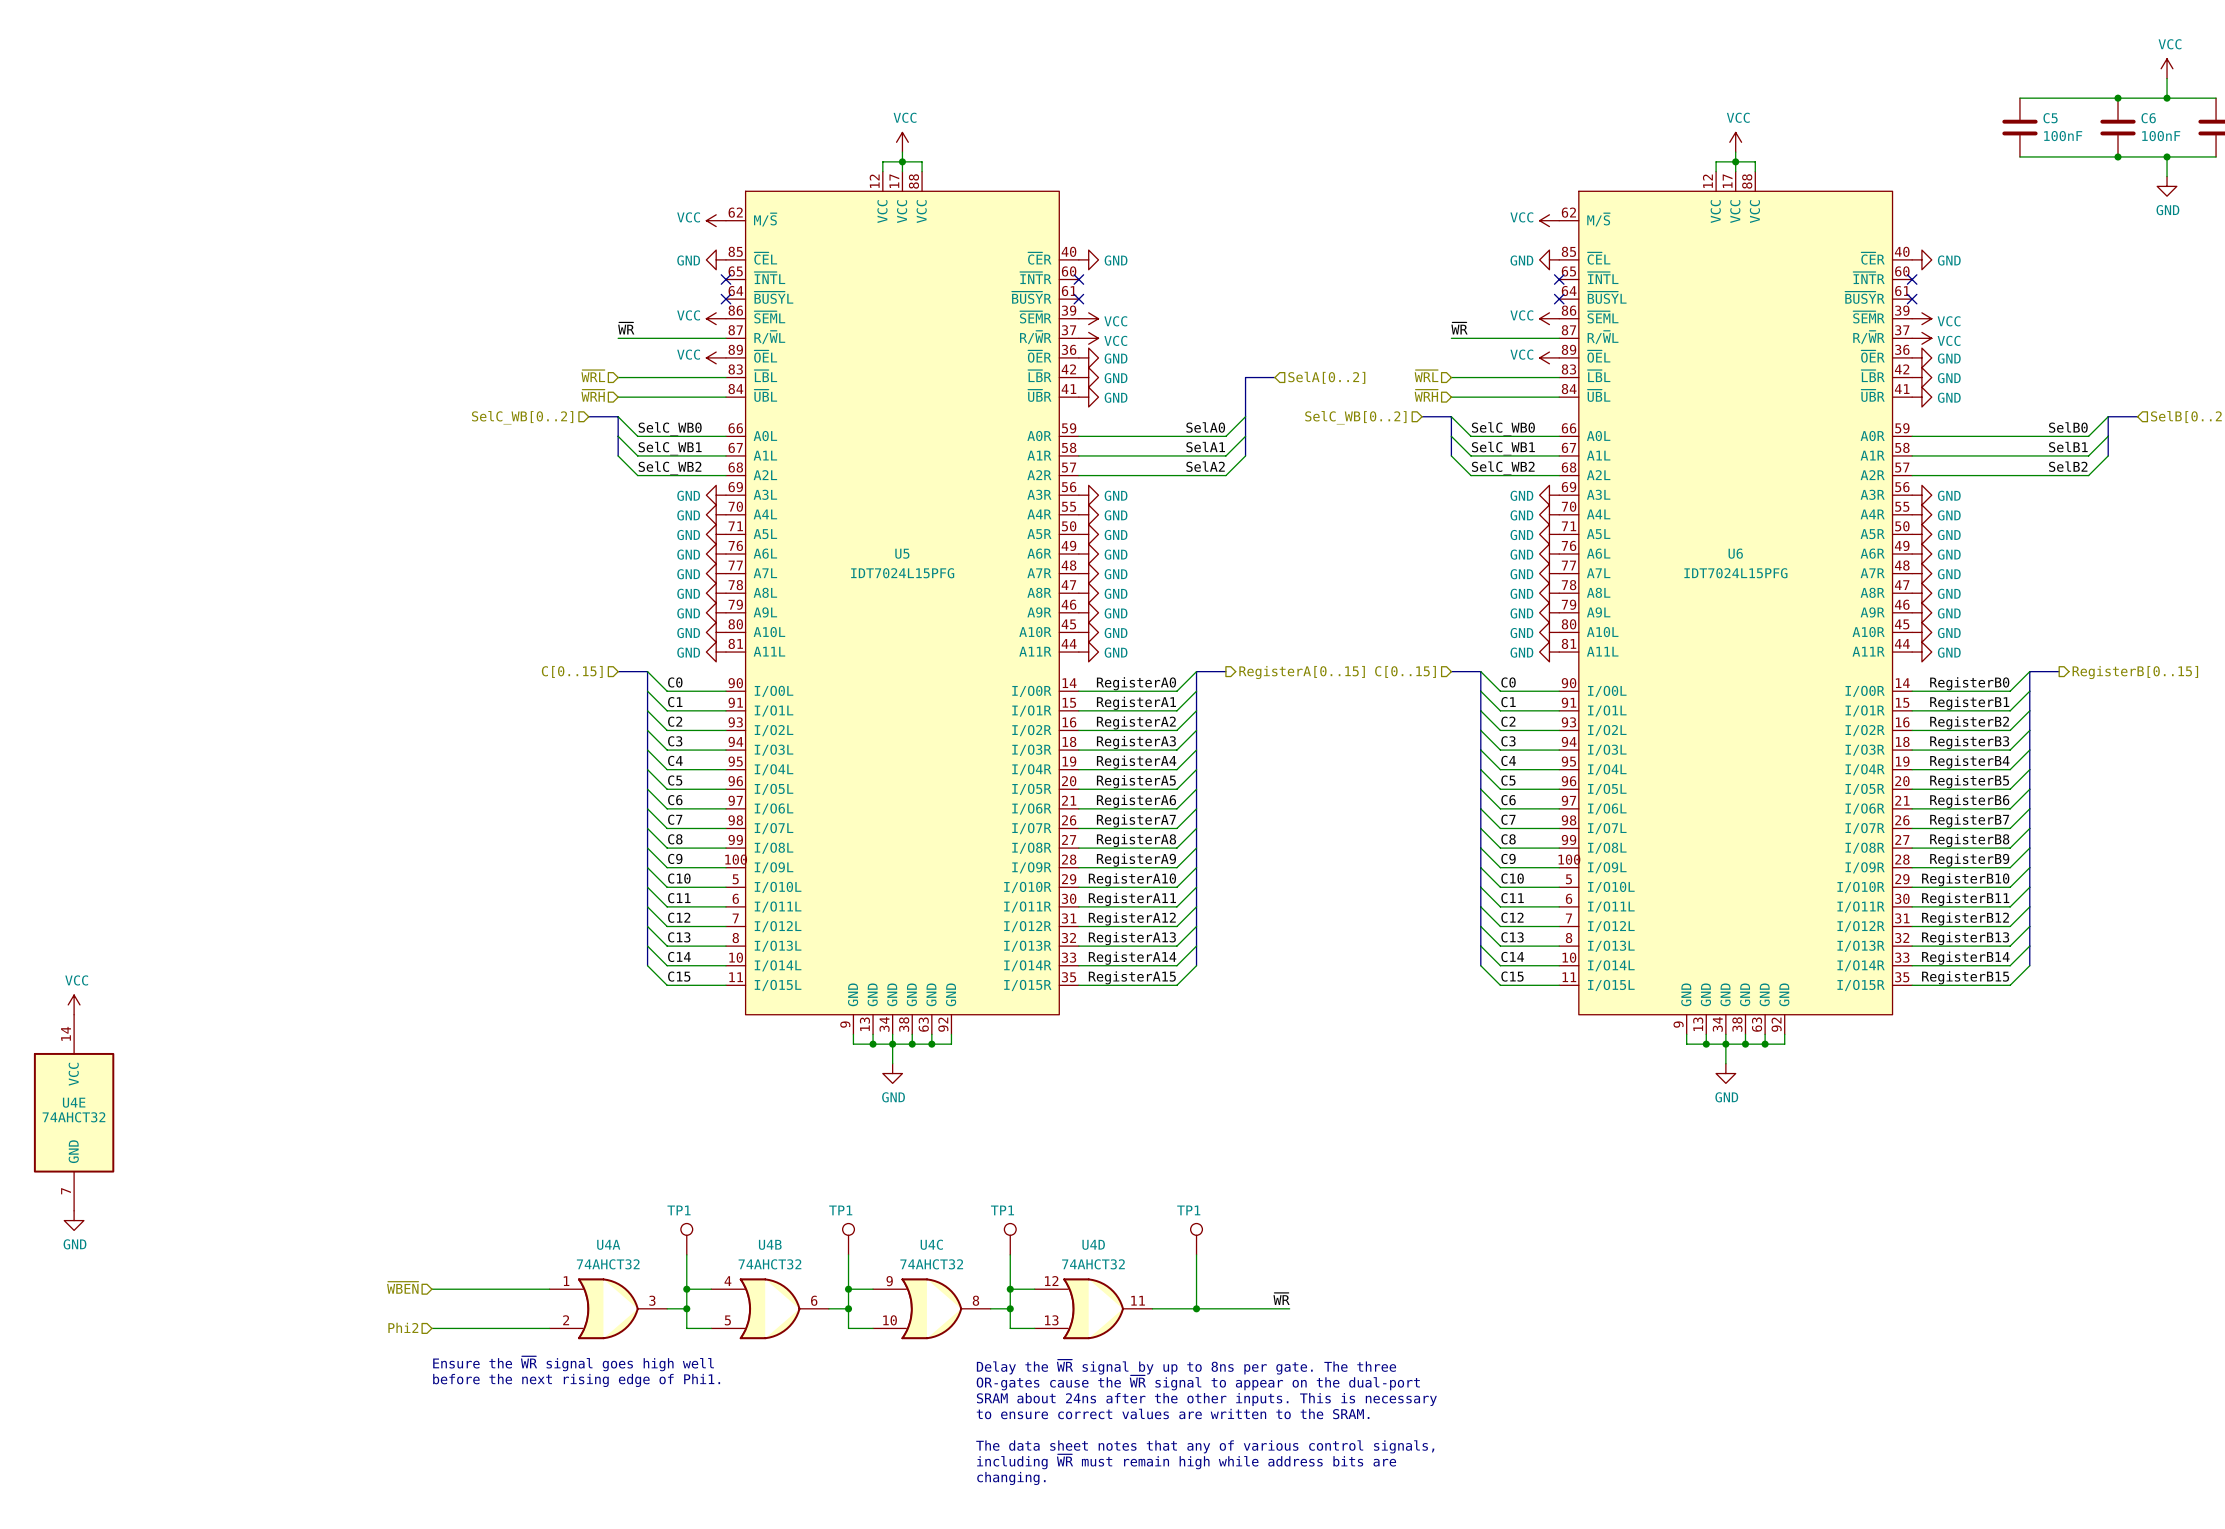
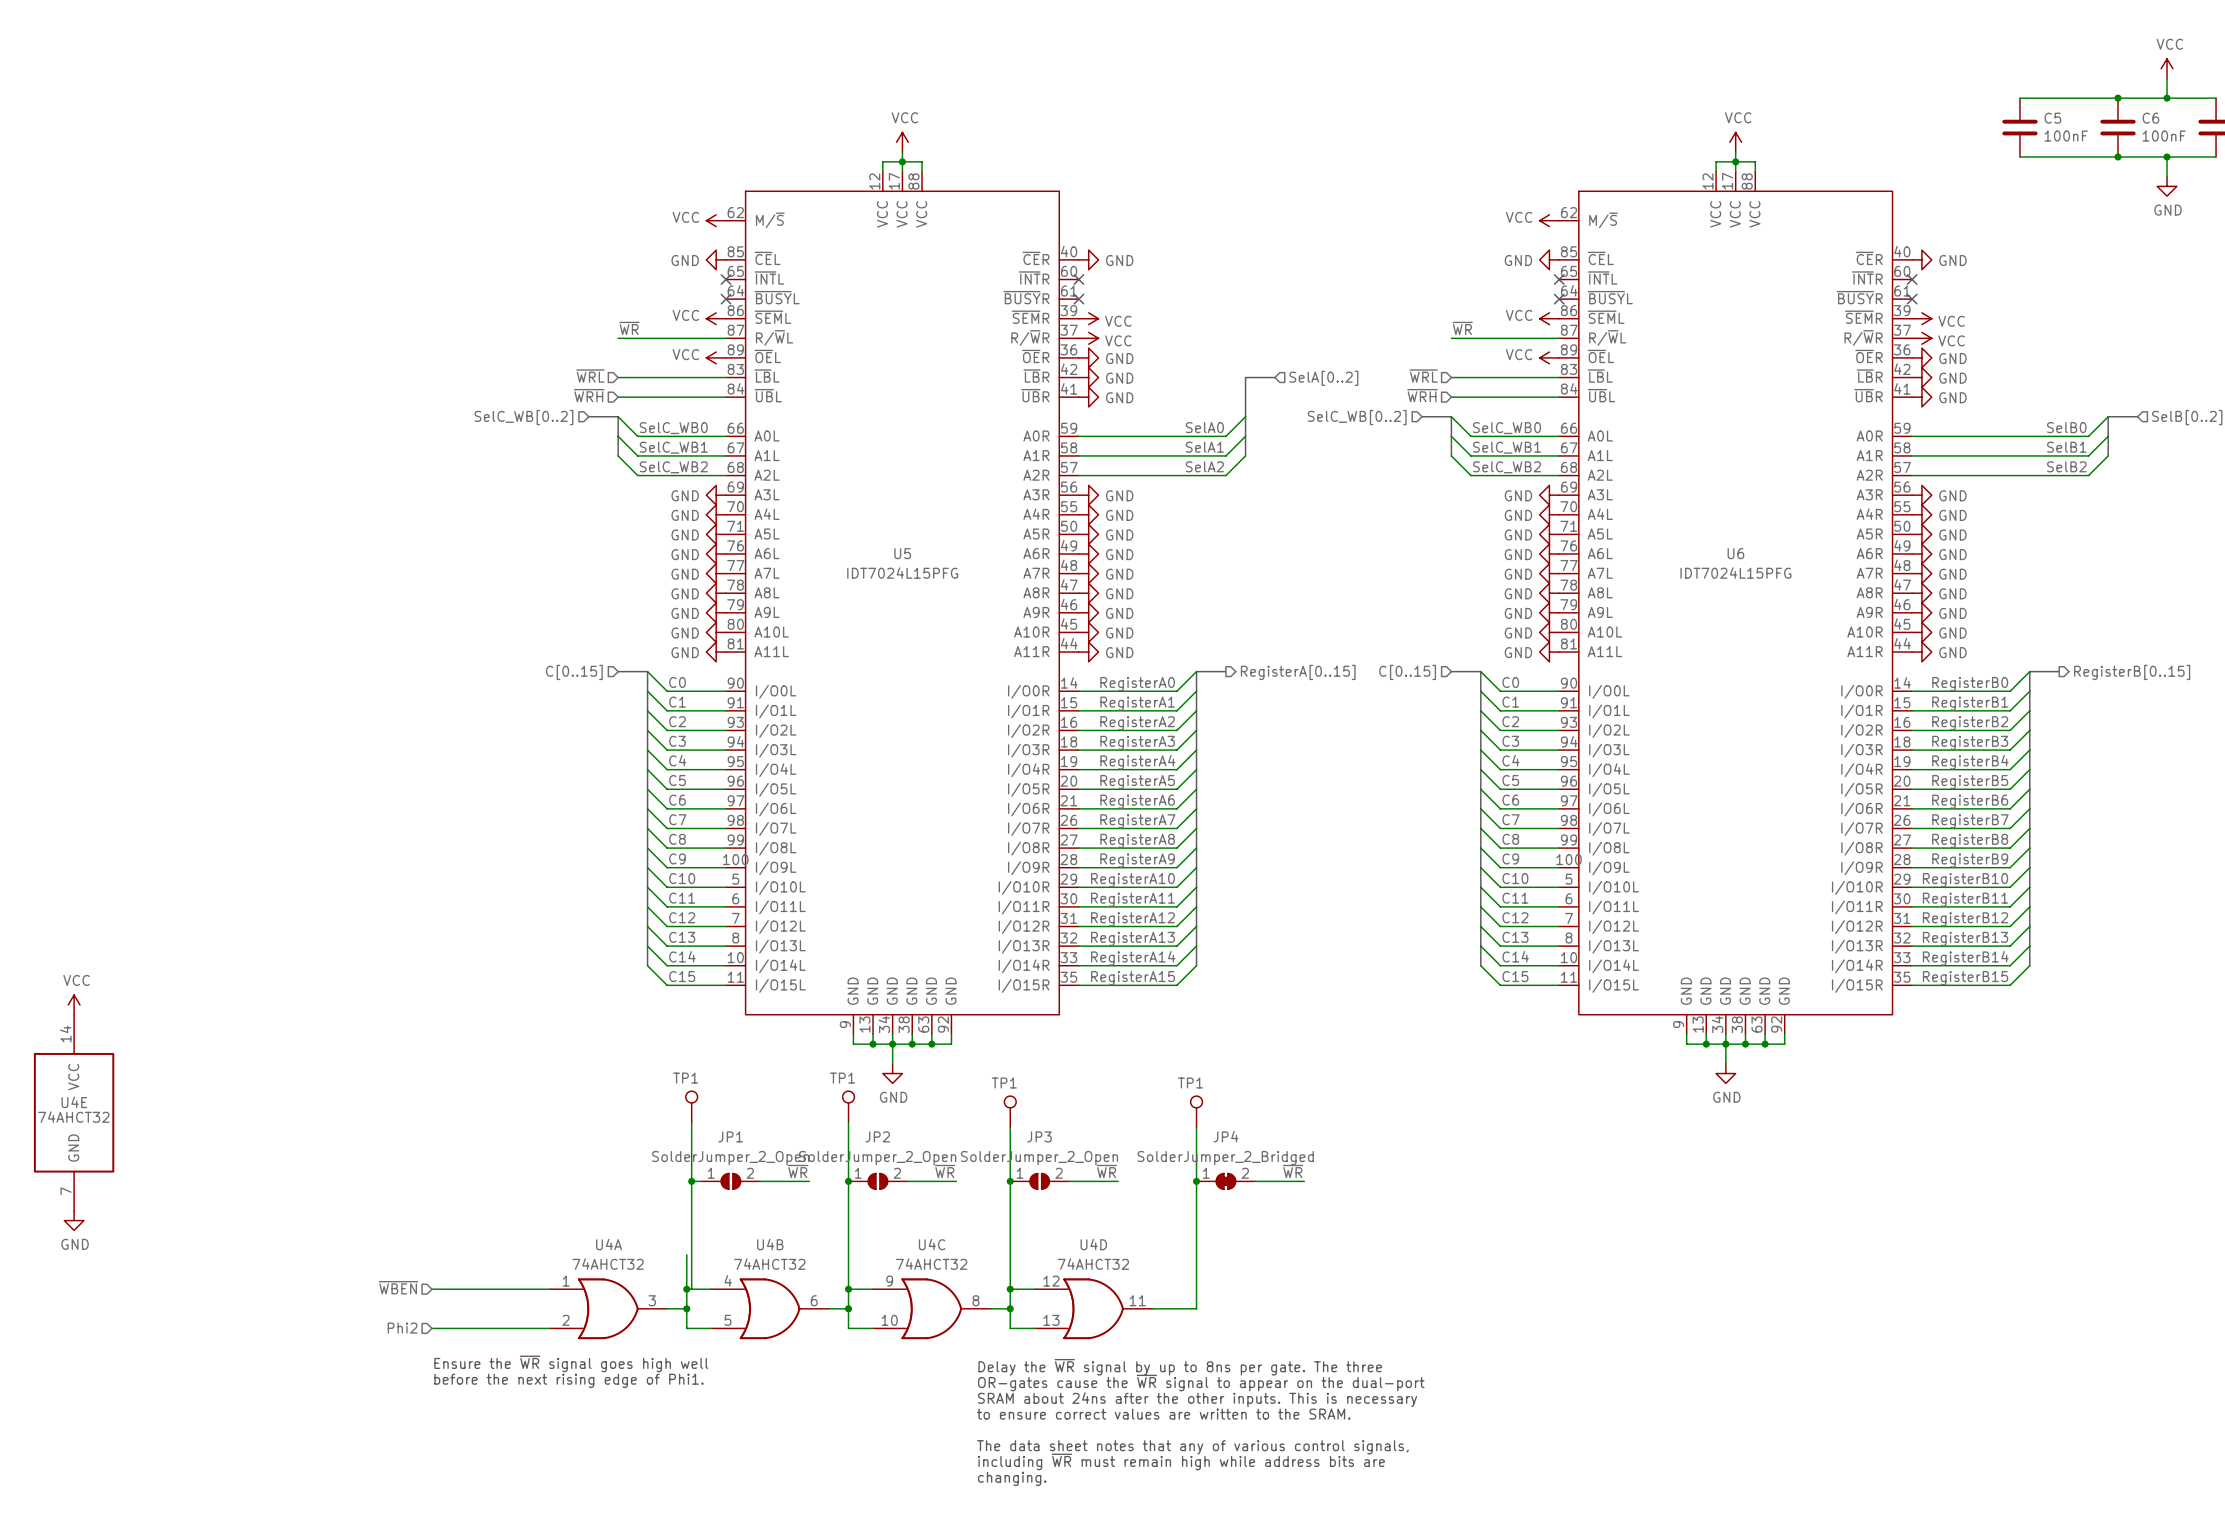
TP1: none -> (691, 1106)
TP1: none -> (848, 1106)
TP1: none -> (1010, 1111)
TP1: none -> (1196, 1111)
wire: none -> (691, 1122) (691, 1289)
wire: none -> (848, 1122) (848, 1254)
wire: none -> (1010, 1127) (1010, 1254)
wire: none -> (1196, 1127) (1196, 1254)
label: none -> ~{WR} (798, 1171)
label: none -> ~{WR} (945, 1171)
label: none -> ~{WR} (1106, 1171)
label: none -> ~{WR} (1293, 1171)
wire: none -> (691, 1181) (701, 1181)
junction: none -> (691, 1181)
JP1: none -> SolderJumper_2_Open (730, 1181)
wire: none -> (760, 1181) (809, 1181)
junction: none -> (848, 1181)
JP2: none -> SolderJumper_2_Open (877, 1181)
wire: none -> (907, 1181) (956, 1181)
junction: none -> (1010, 1181)
JP3: none -> SolderJumper_2_Open (1039, 1181)
wire: none -> (1069, 1181) (1118, 1181)
junction: none -> (1196, 1181)
JP4: none -> SolderJumper_2_Bridged (1225, 1181)
wire: none -> (1255, 1181) (1304, 1181)
TP1: (686, 1239) -> none
TP1: (848, 1239) -> none
TP1: (1010, 1239) -> none
TP1: (1196, 1239) -> none
label: ~{WR} (1281, 1298) -> none
wire: (1196, 1308) (1289, 1308) -> none
junction: (1196, 1308) -> none

